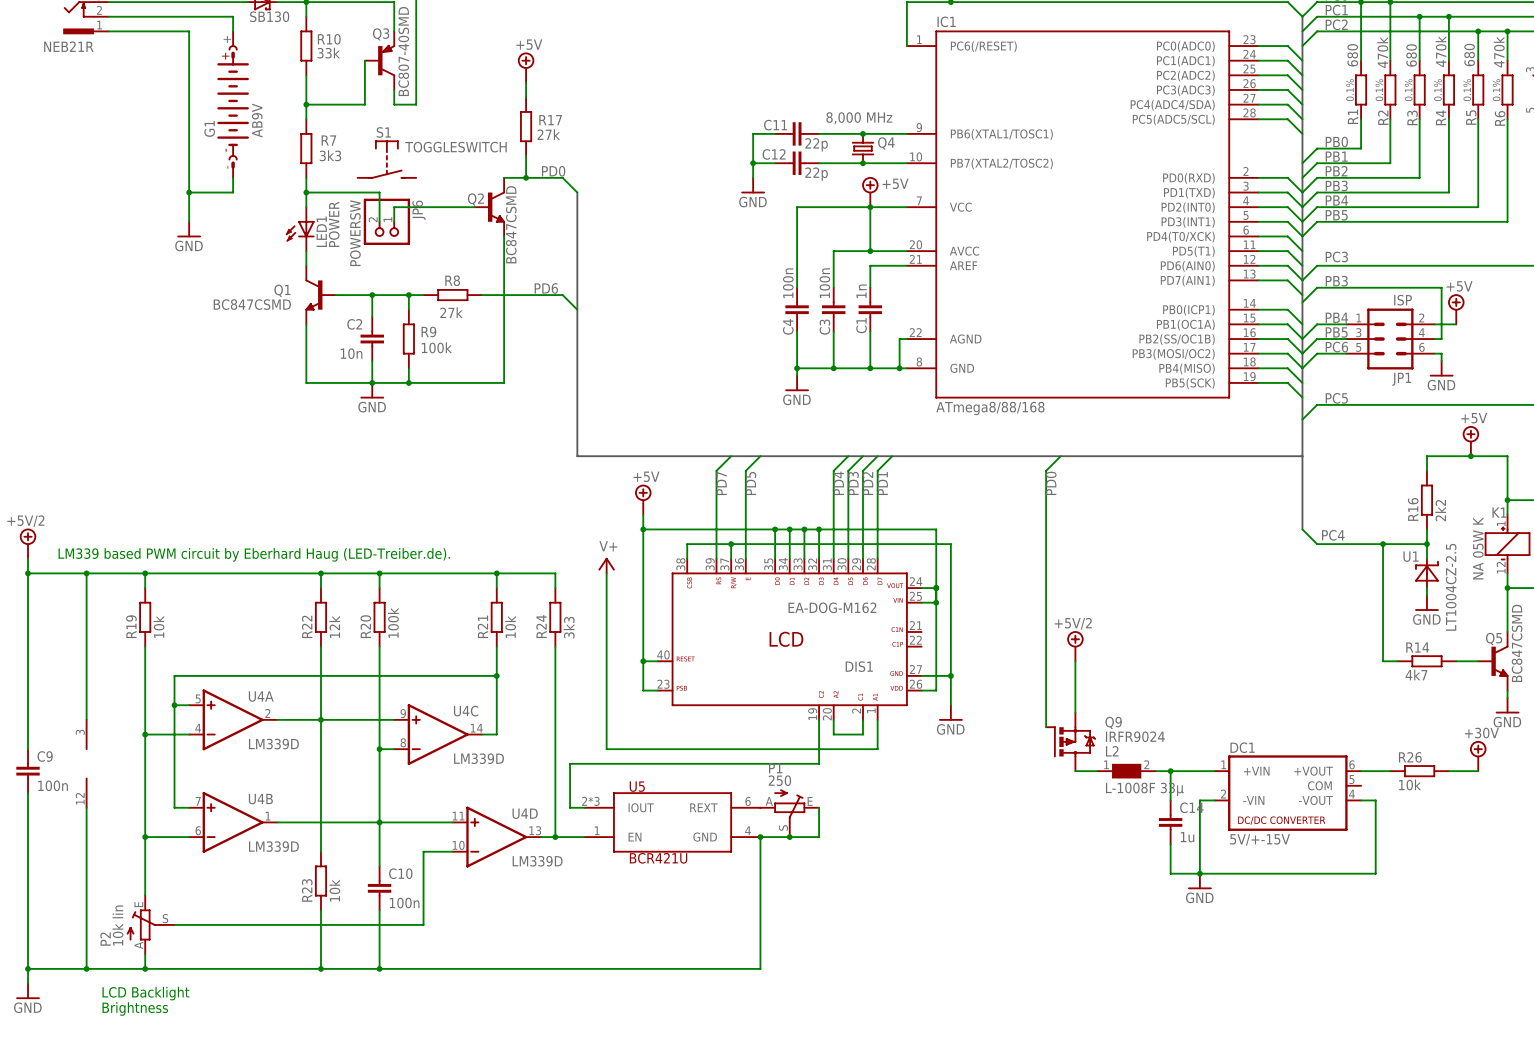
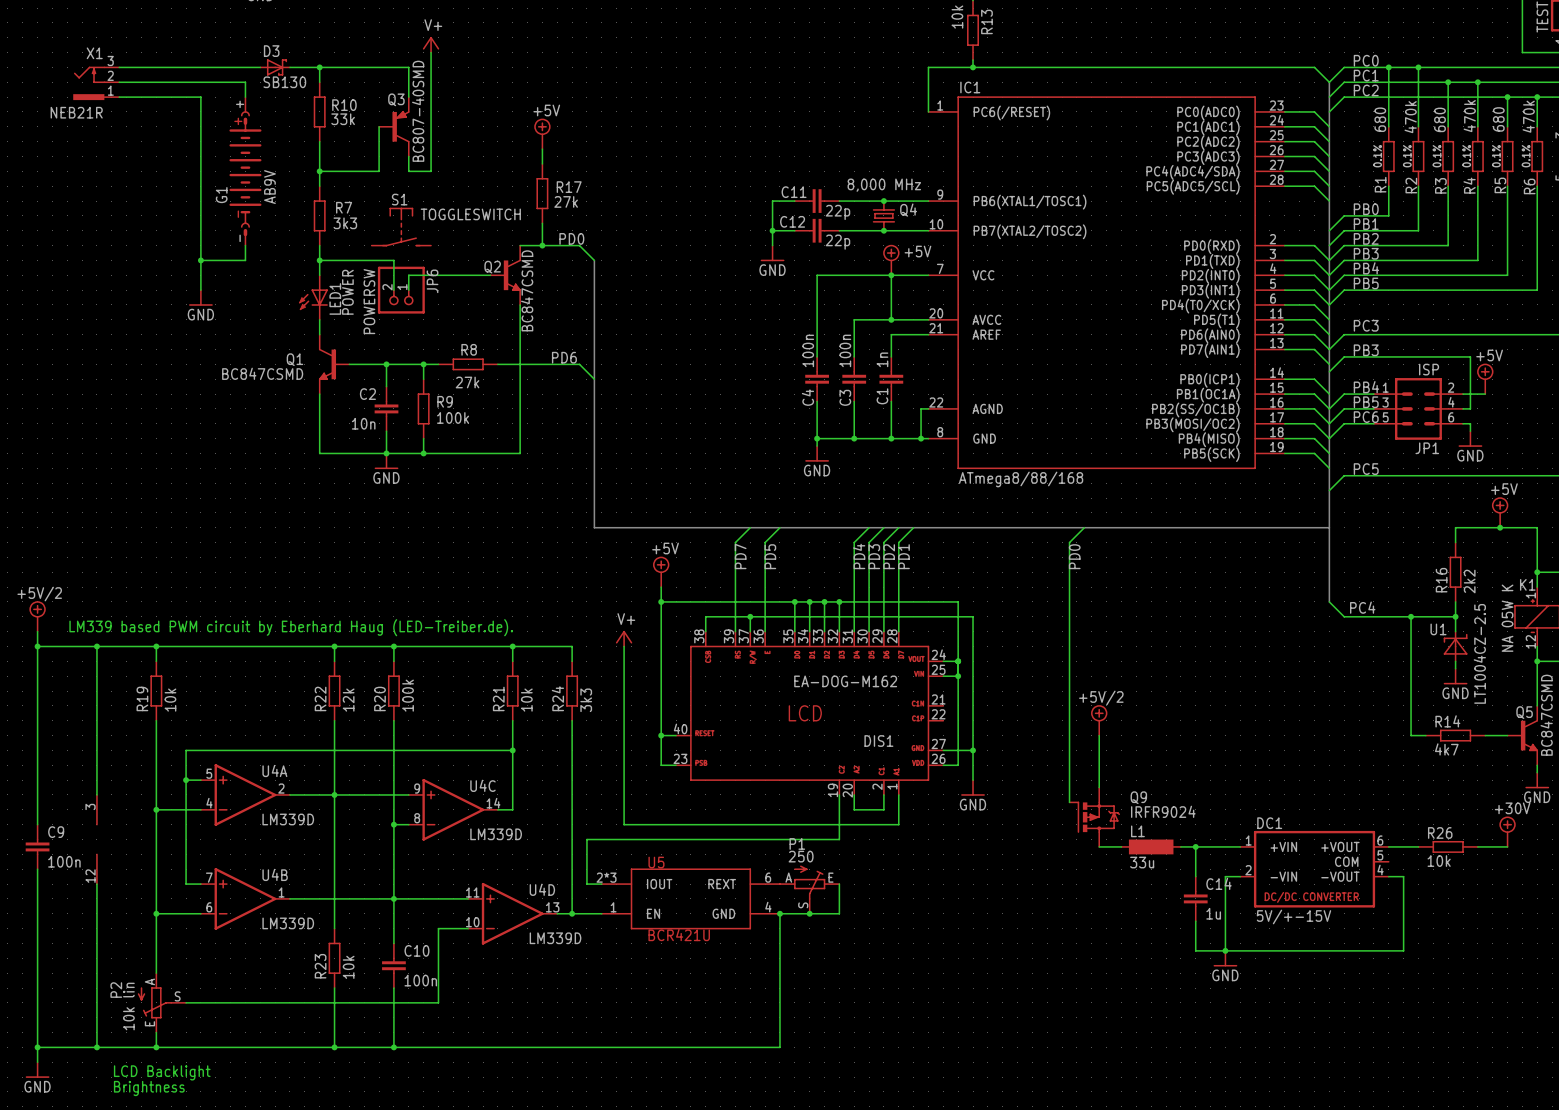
L2: L-1008F 33µ (1126, 771) -> none
L1: none -> 33u (1151, 846)
P2 flip: as is (143, 924) -> up-down (154, 1002)

